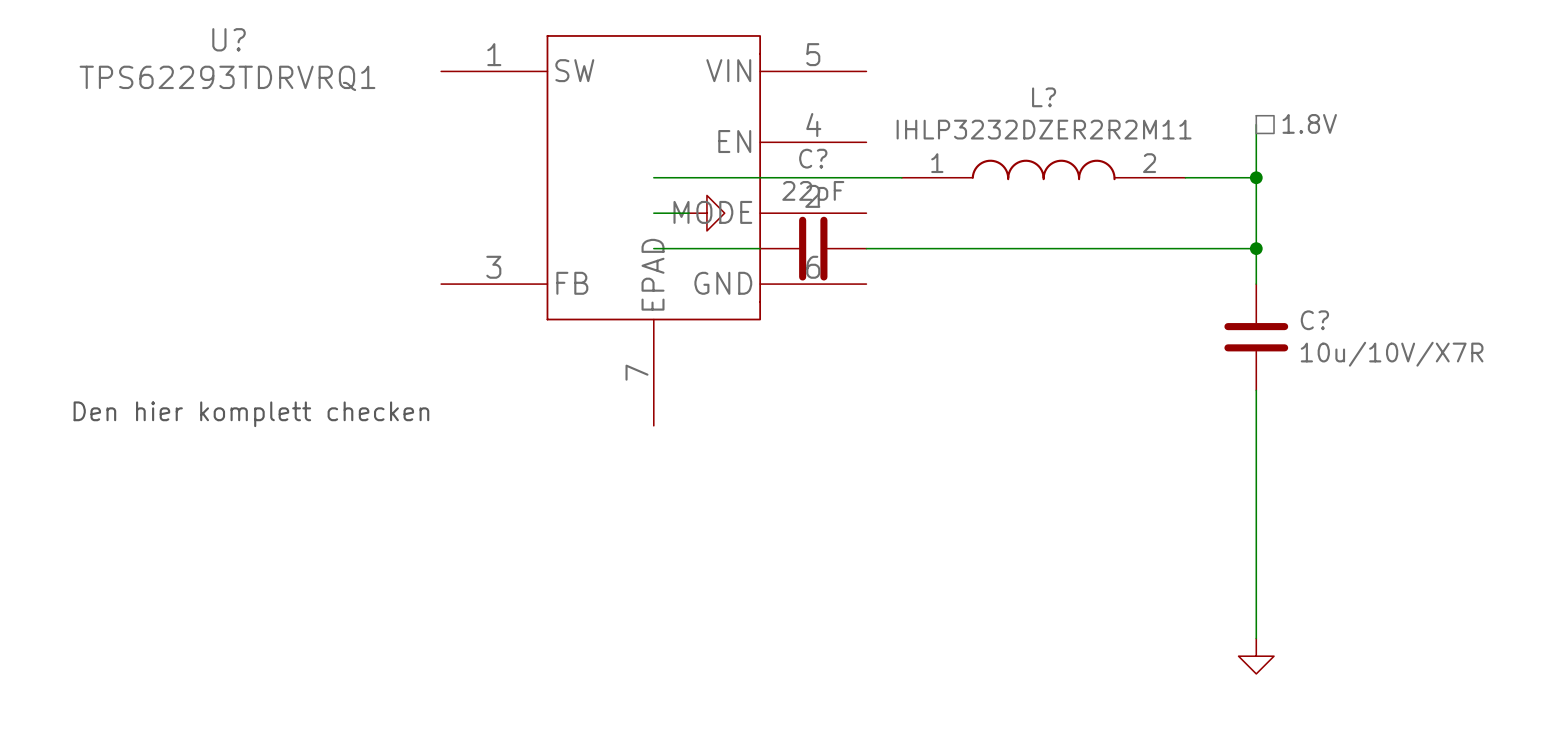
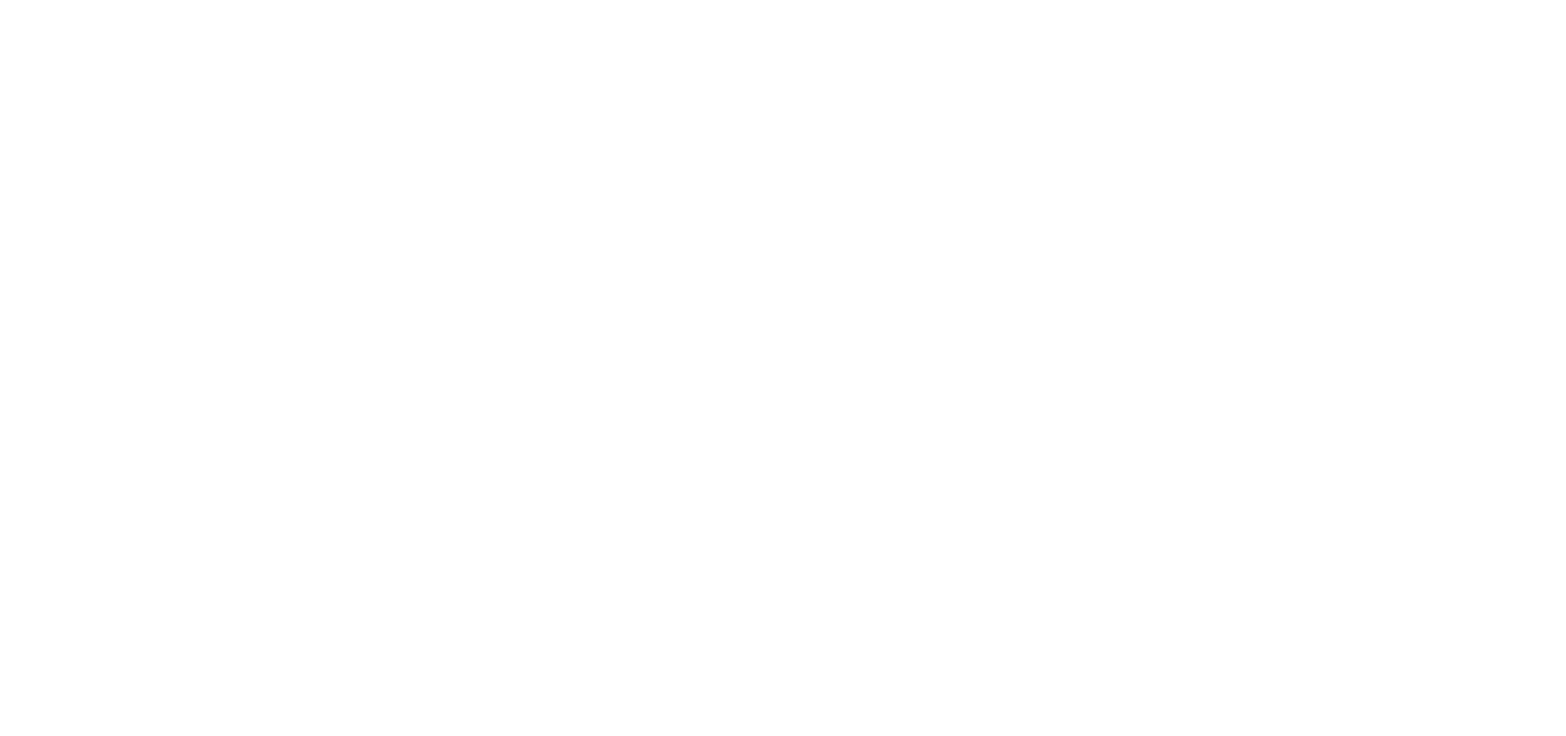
hierarchical label: 1.8V (1309, 123) -> none
wire: (1256, 124) (1256, 284) -> none
L?: IHLP3232DZER2R2M11 (1043, 169) -> none
wire: (653, 177) (901, 177) -> none
wire: (1185, 177) (1256, 177) -> none
junction: (1256, 177) -> none
wire: (653, 213) (689, 213) -> none
power symbol: (706, 213) -> none
U?: TPS62293TDRVRQ1 (653, 230) -> none
wire: (653, 248) (760, 248) -> none
C?: 22pF (813, 248) -> none
wire: (866, 248) (1256, 248) -> none
junction: (1256, 248) -> none
C?: 10u/10V/X7R (1256, 337) -> none
wire: (1256, 390) (1256, 638) -> none
text: Den hier komplett checken (251, 414) -> none
power symbol: (1256, 656) -> none

